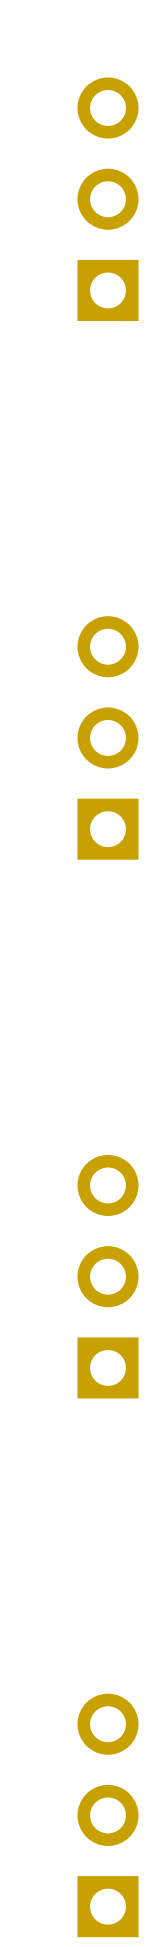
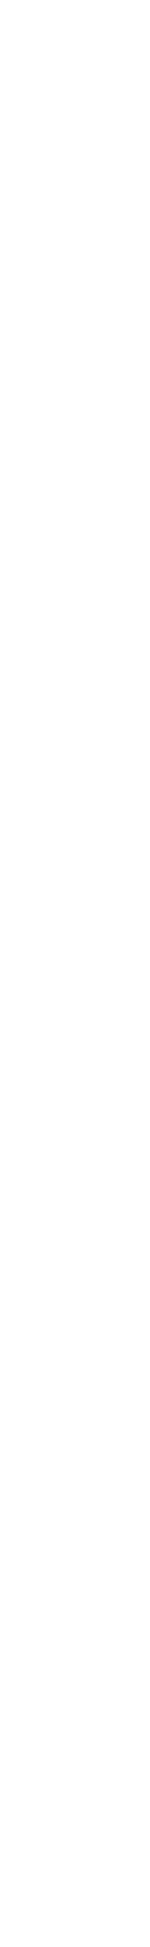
part: (108, 199) -> none
part: (108, 737) -> none
part: (108, 1276) -> none
part: (108, 1815) -> none

